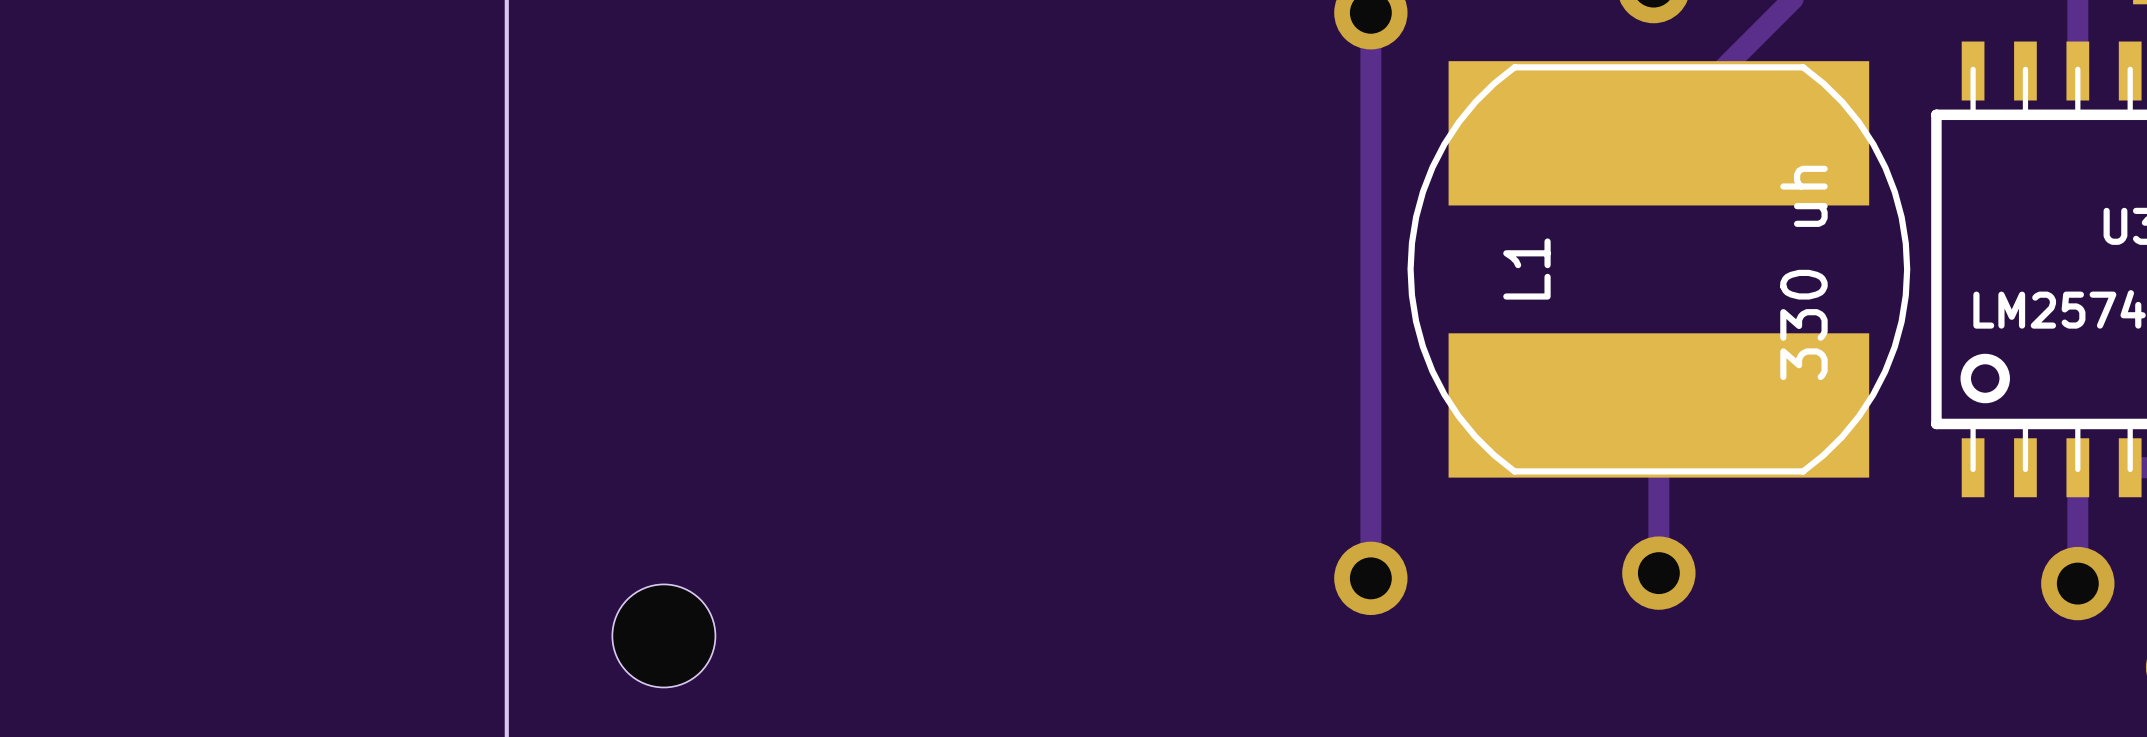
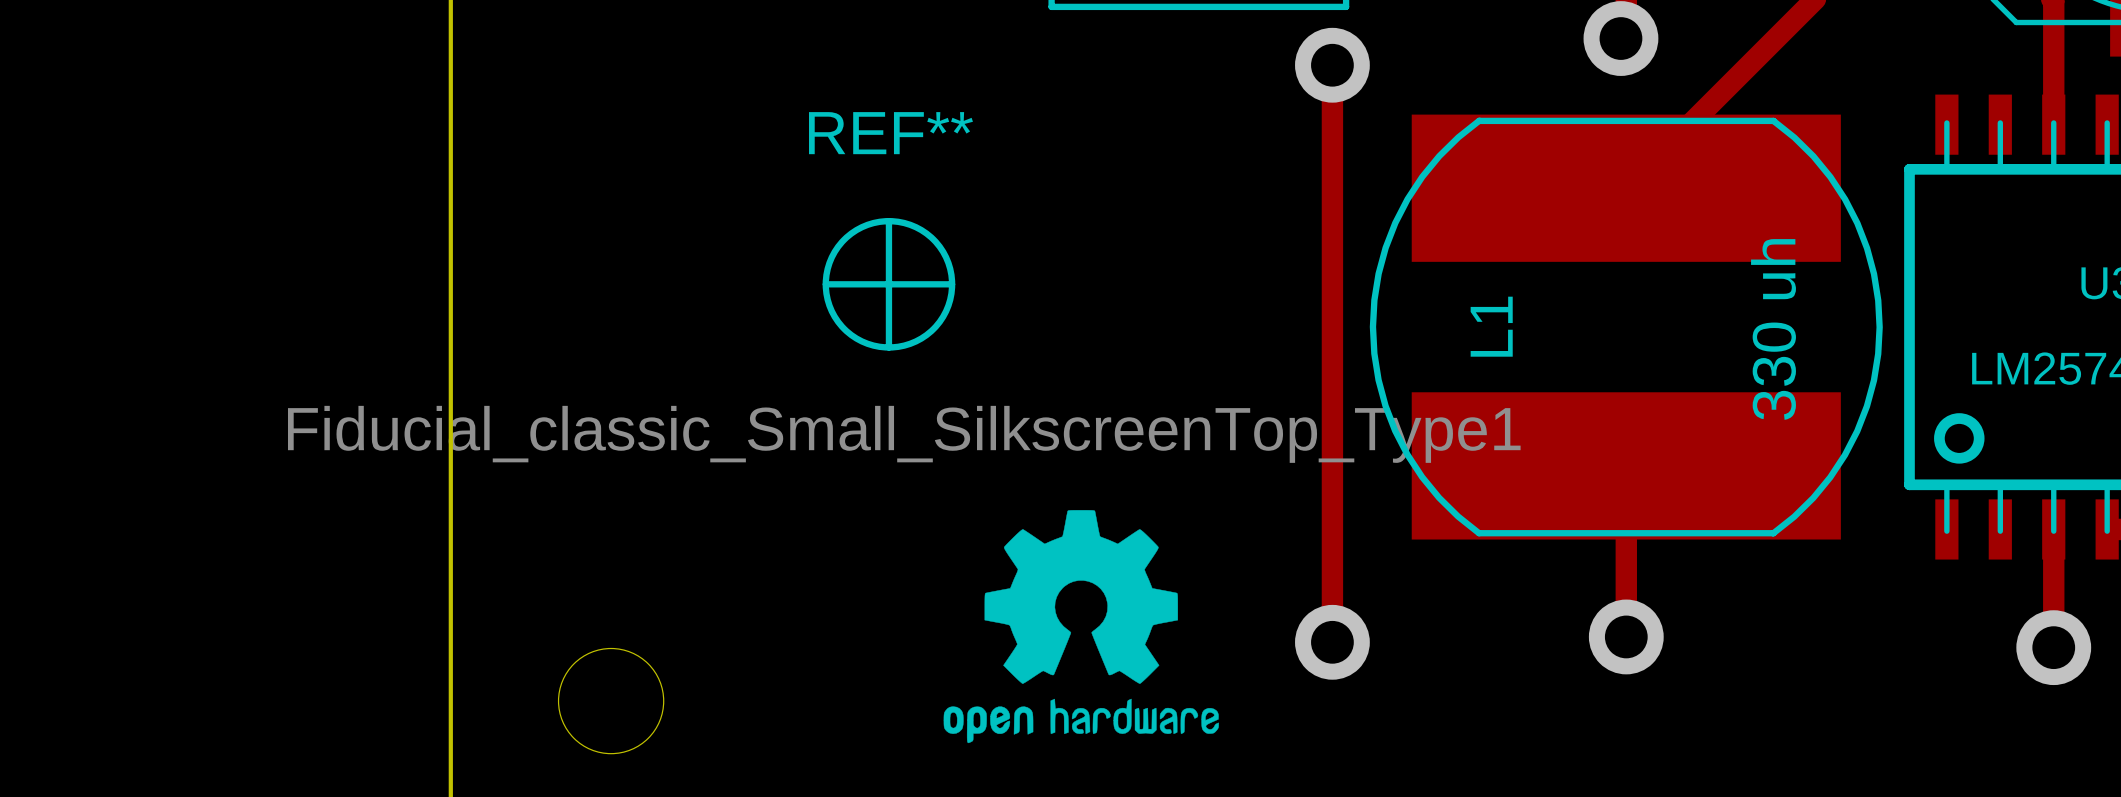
REF**: none -> Fiducial_classic_Small_SilkscreenTop_Type1 (888, 284)
drawing: none -> [943, 510, 1219, 744]

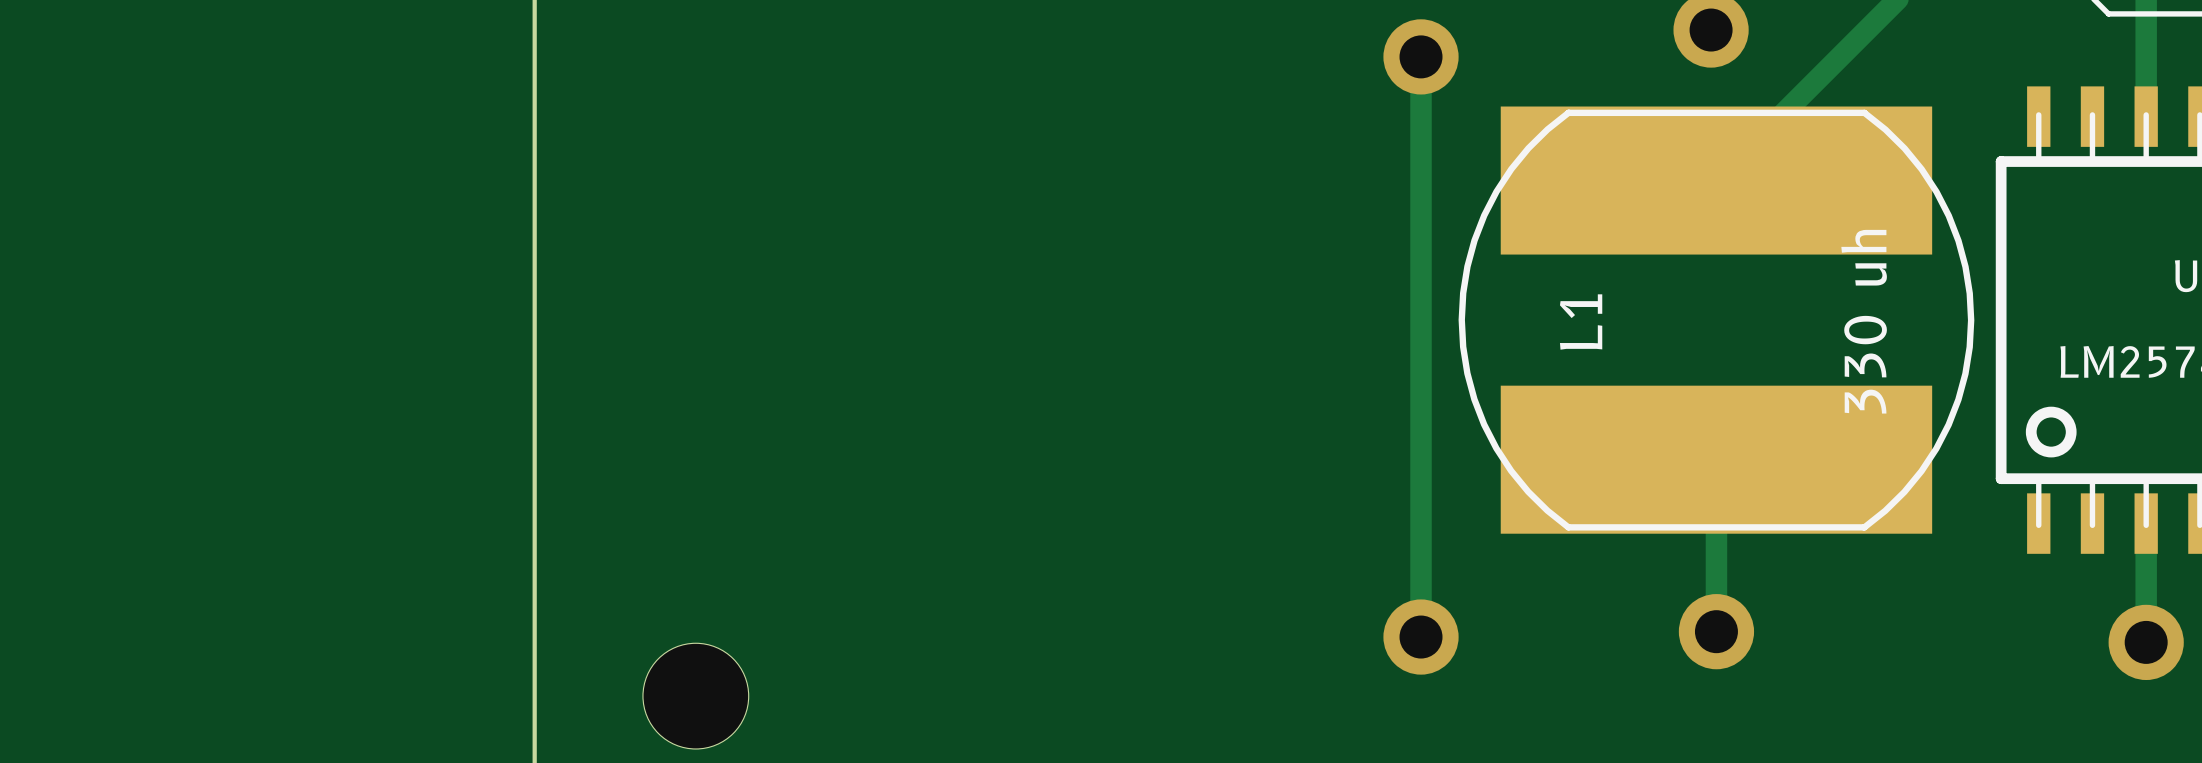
REF**: Fiducial_classic_Small_SilkscreenTop_Type1 (888, 284) -> none
drawing: [943, 510, 1219, 744] -> none

